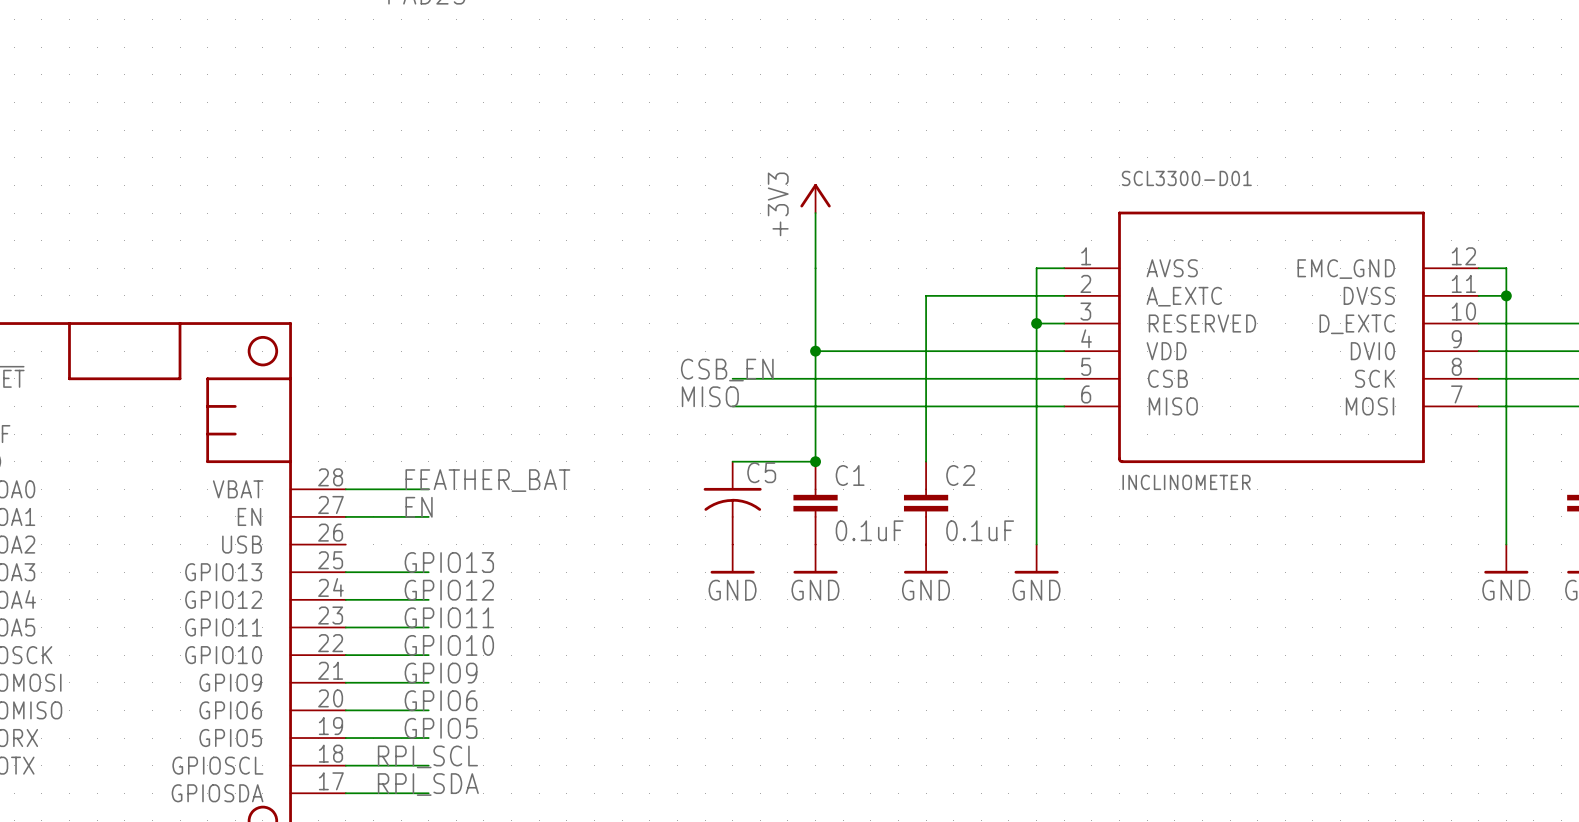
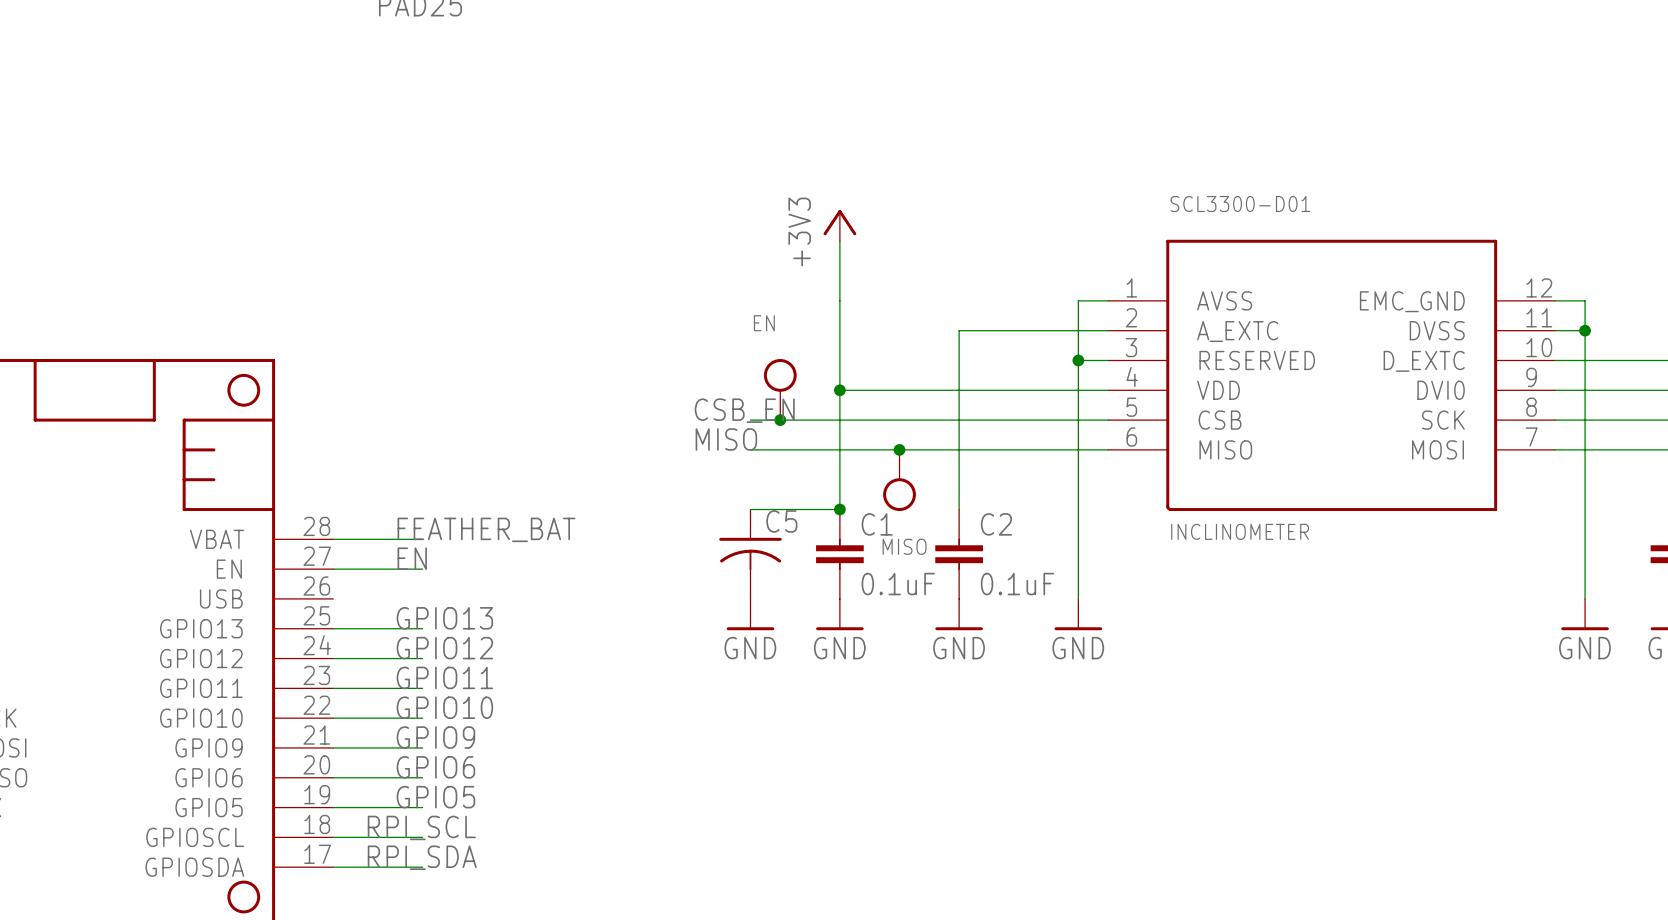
EN: none -> (780, 389)
junction: none -> (780, 420)
junction: none -> (899, 449)
MISO: none -> (899, 480)

